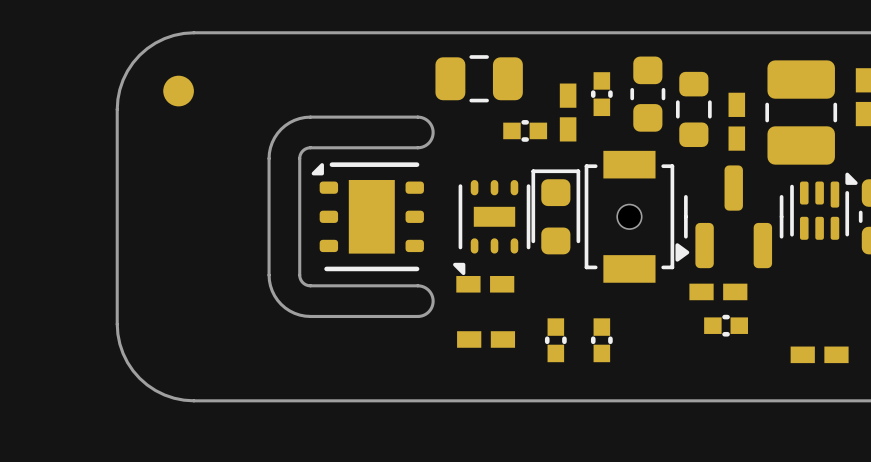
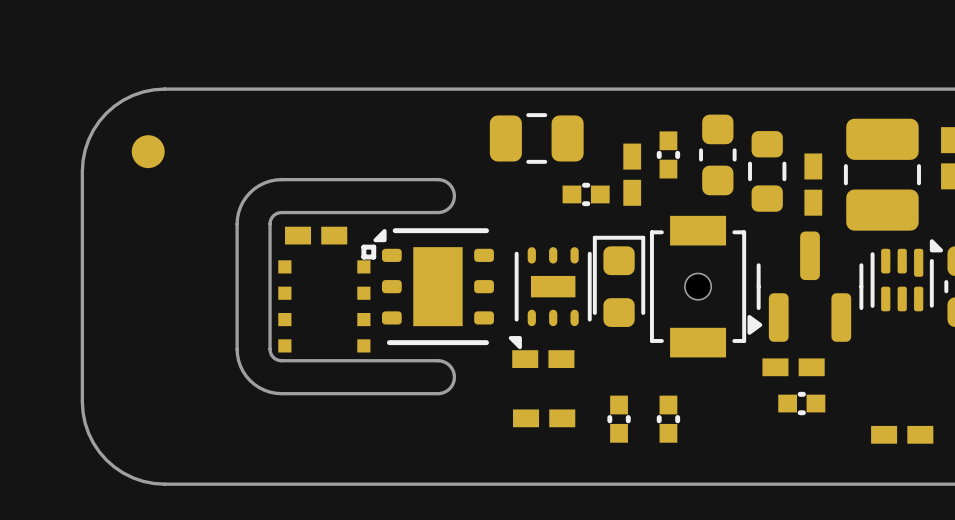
board edge: (193, 32) (164, 38) (147, 48) (127, 71) (119, 89) (117, 109) (117, 324) (123, 353) (139, 378) (164, 394) (193, 400) -> (230, 89) (153, 89) (123, 100) (106, 113) (93, 130) (85, 150) (82, 171) (82, 401) (88, 433) (106, 460) (133, 477) (164, 484) (230, 484)
part position: (178, 91) -> (148, 151)
board edge: (310, 117) (294, 120) (281, 129) (272, 142) (269, 158) (270, 285) (277, 300) (285, 307) (299, 315) (310, 316) -> (355, 179) (281, 179) (264, 183) (250, 192) (243, 201) (238, 212) (237, 224) (237, 349) (238, 360) (246, 376) (259, 387) (275, 393) (355, 393)
board edge: (387, 117) (421, 117) (429, 123) (433, 132) (429, 141) (421, 147) (387, 147) -> (437, 179) (449, 184) (454, 196) (449, 207) (437, 212)
board edge: (310, 147) (302, 150) (299, 158) (299, 276) (302, 282) (310, 285) -> (355, 212) (280, 212) (272, 217) (270, 224) (271, 354) (280, 360) (355, 360)
part: none -> (316, 235)
part position: (367, 216) -> (433, 286)
part: none -> (327, 298)
board edge: (387, 285) (421, 286) (429, 291) (433, 301) (429, 310) (421, 315) (387, 316) -> (437, 360) (449, 365) (454, 377) (449, 388) (437, 393)

